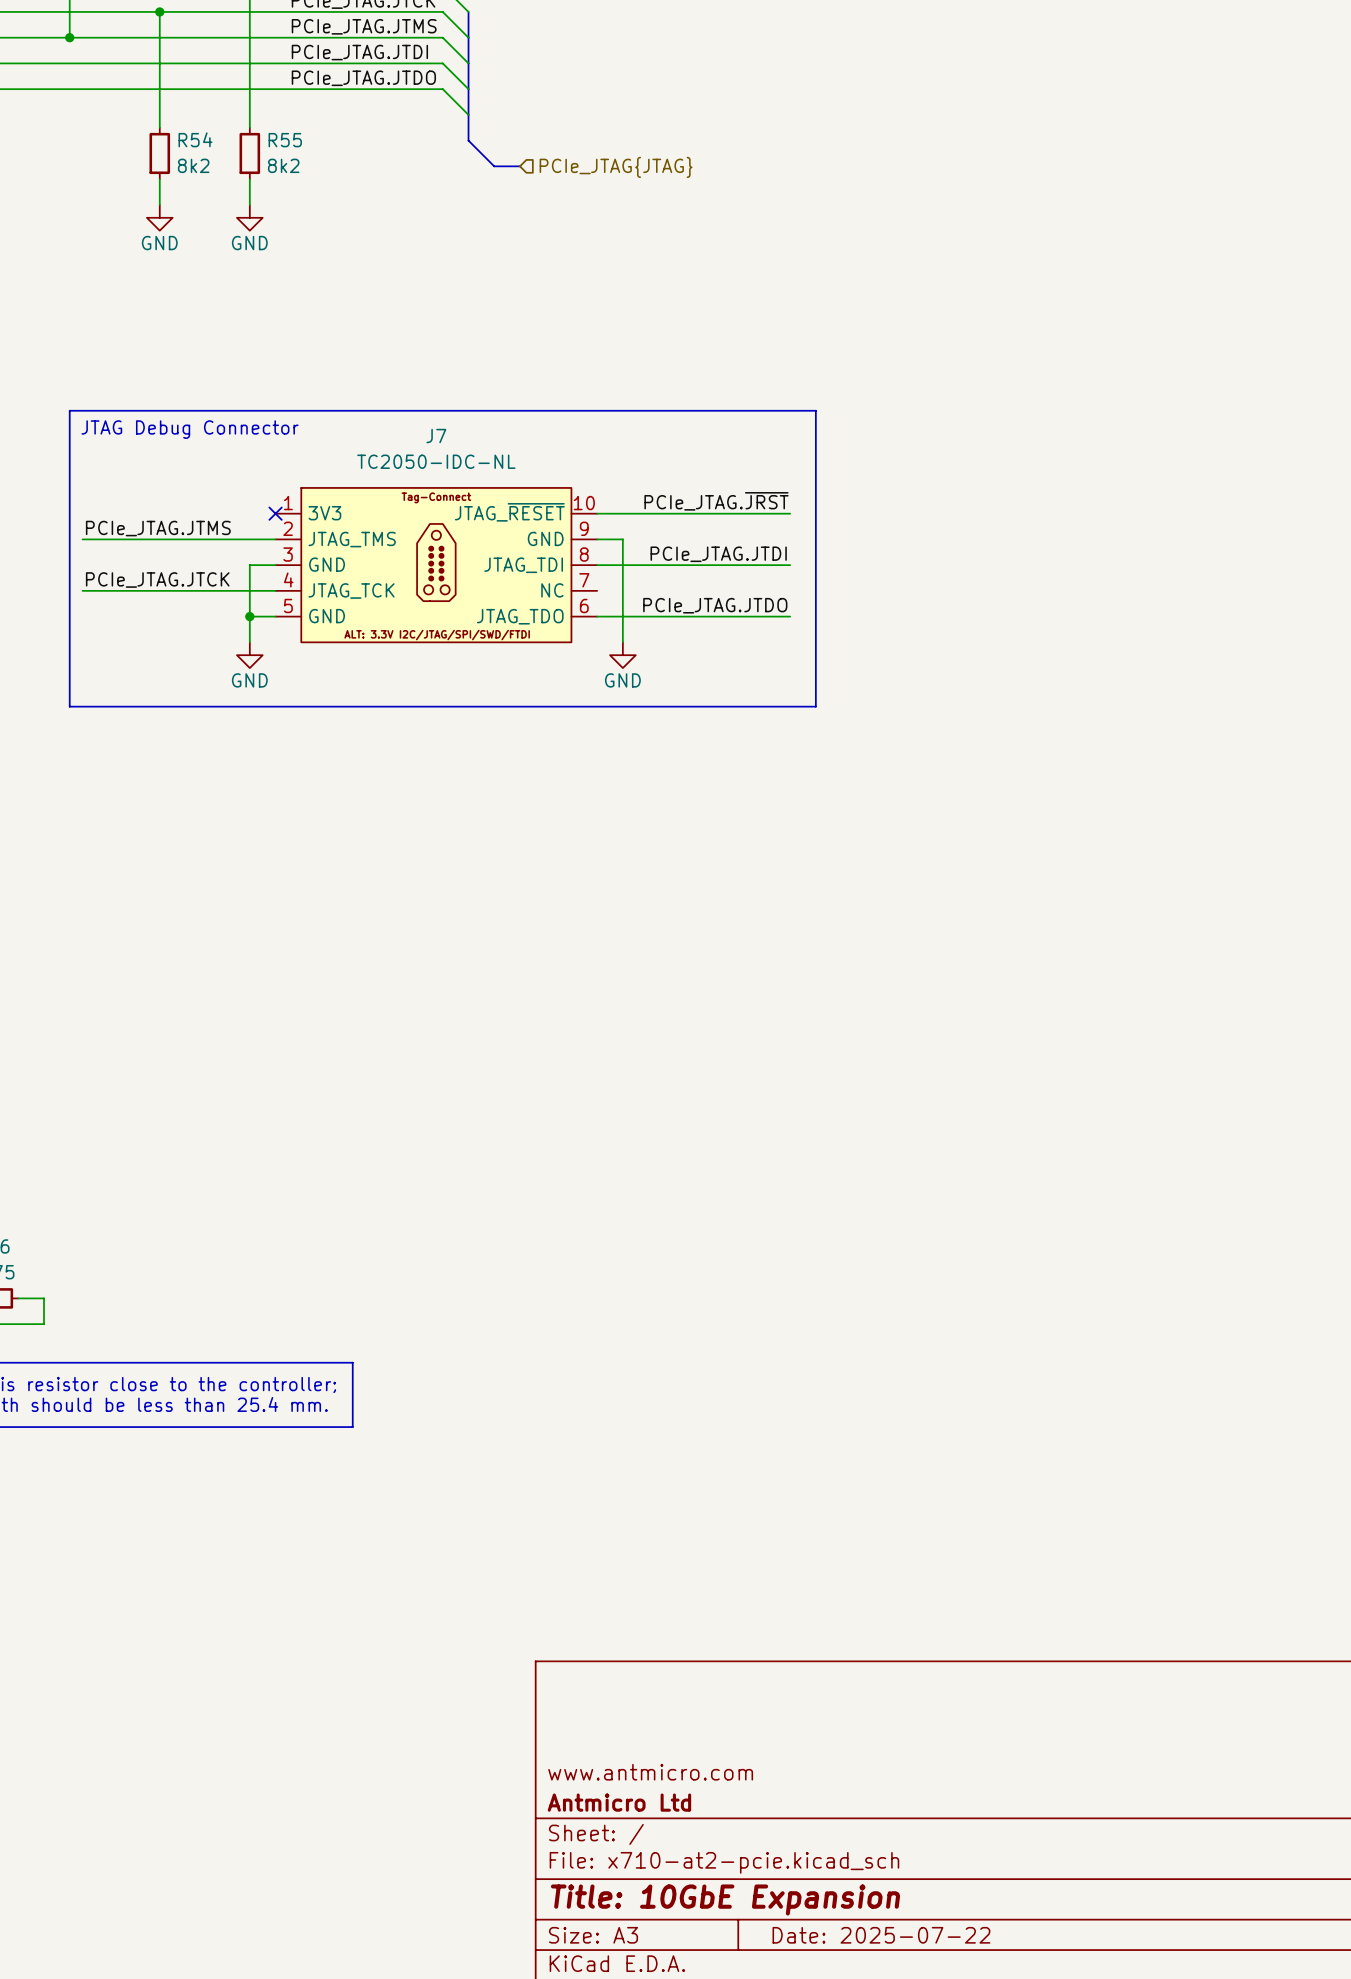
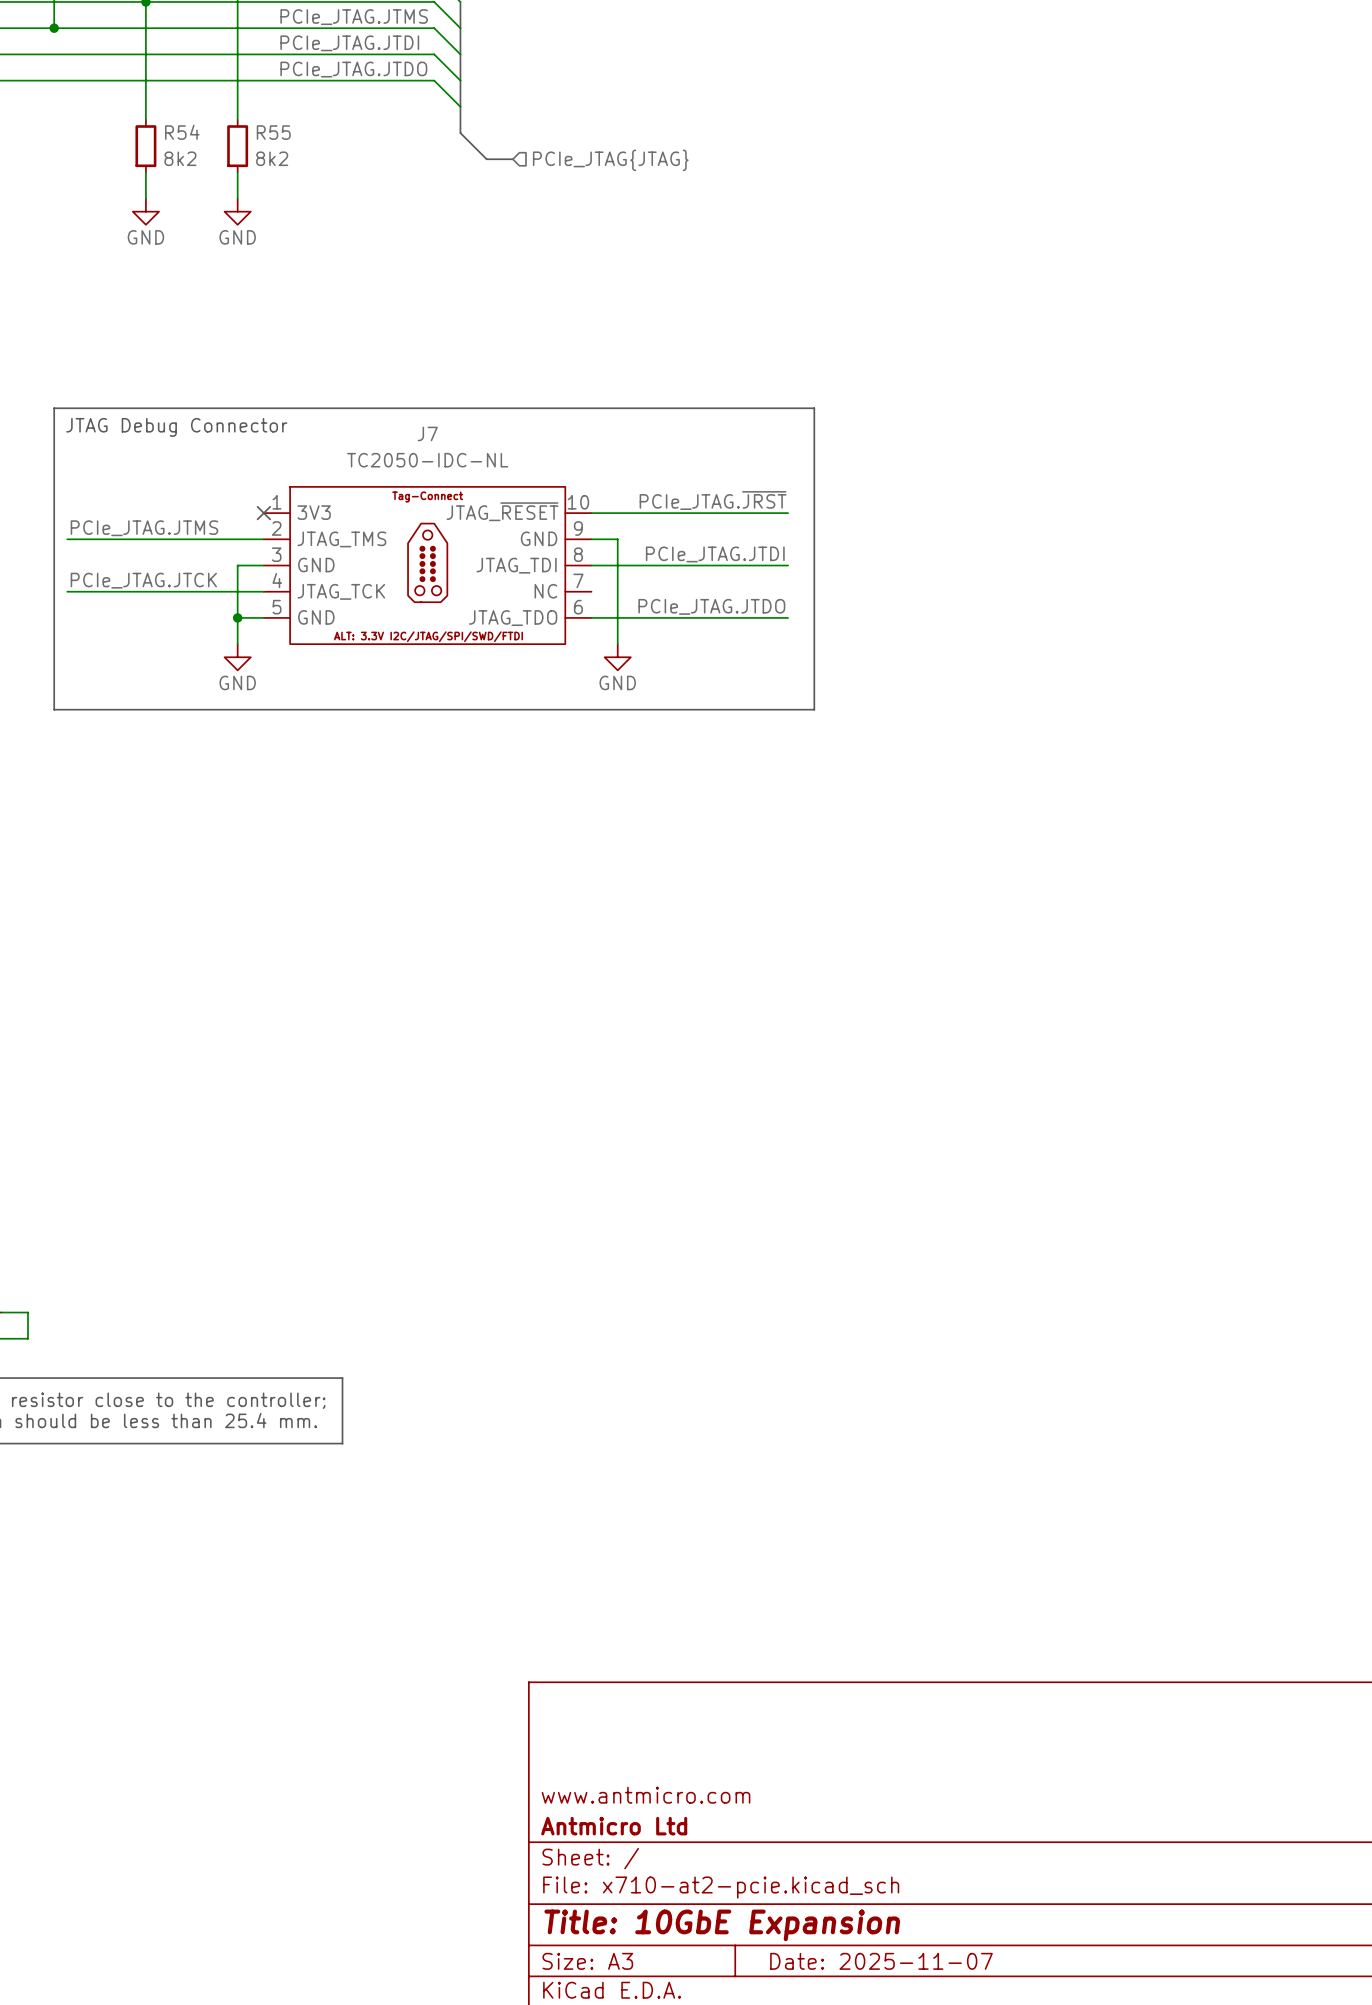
title block: Date: 2025-07-22 (881, 1935) -> Date: 2025-11-07 (881, 1961)

